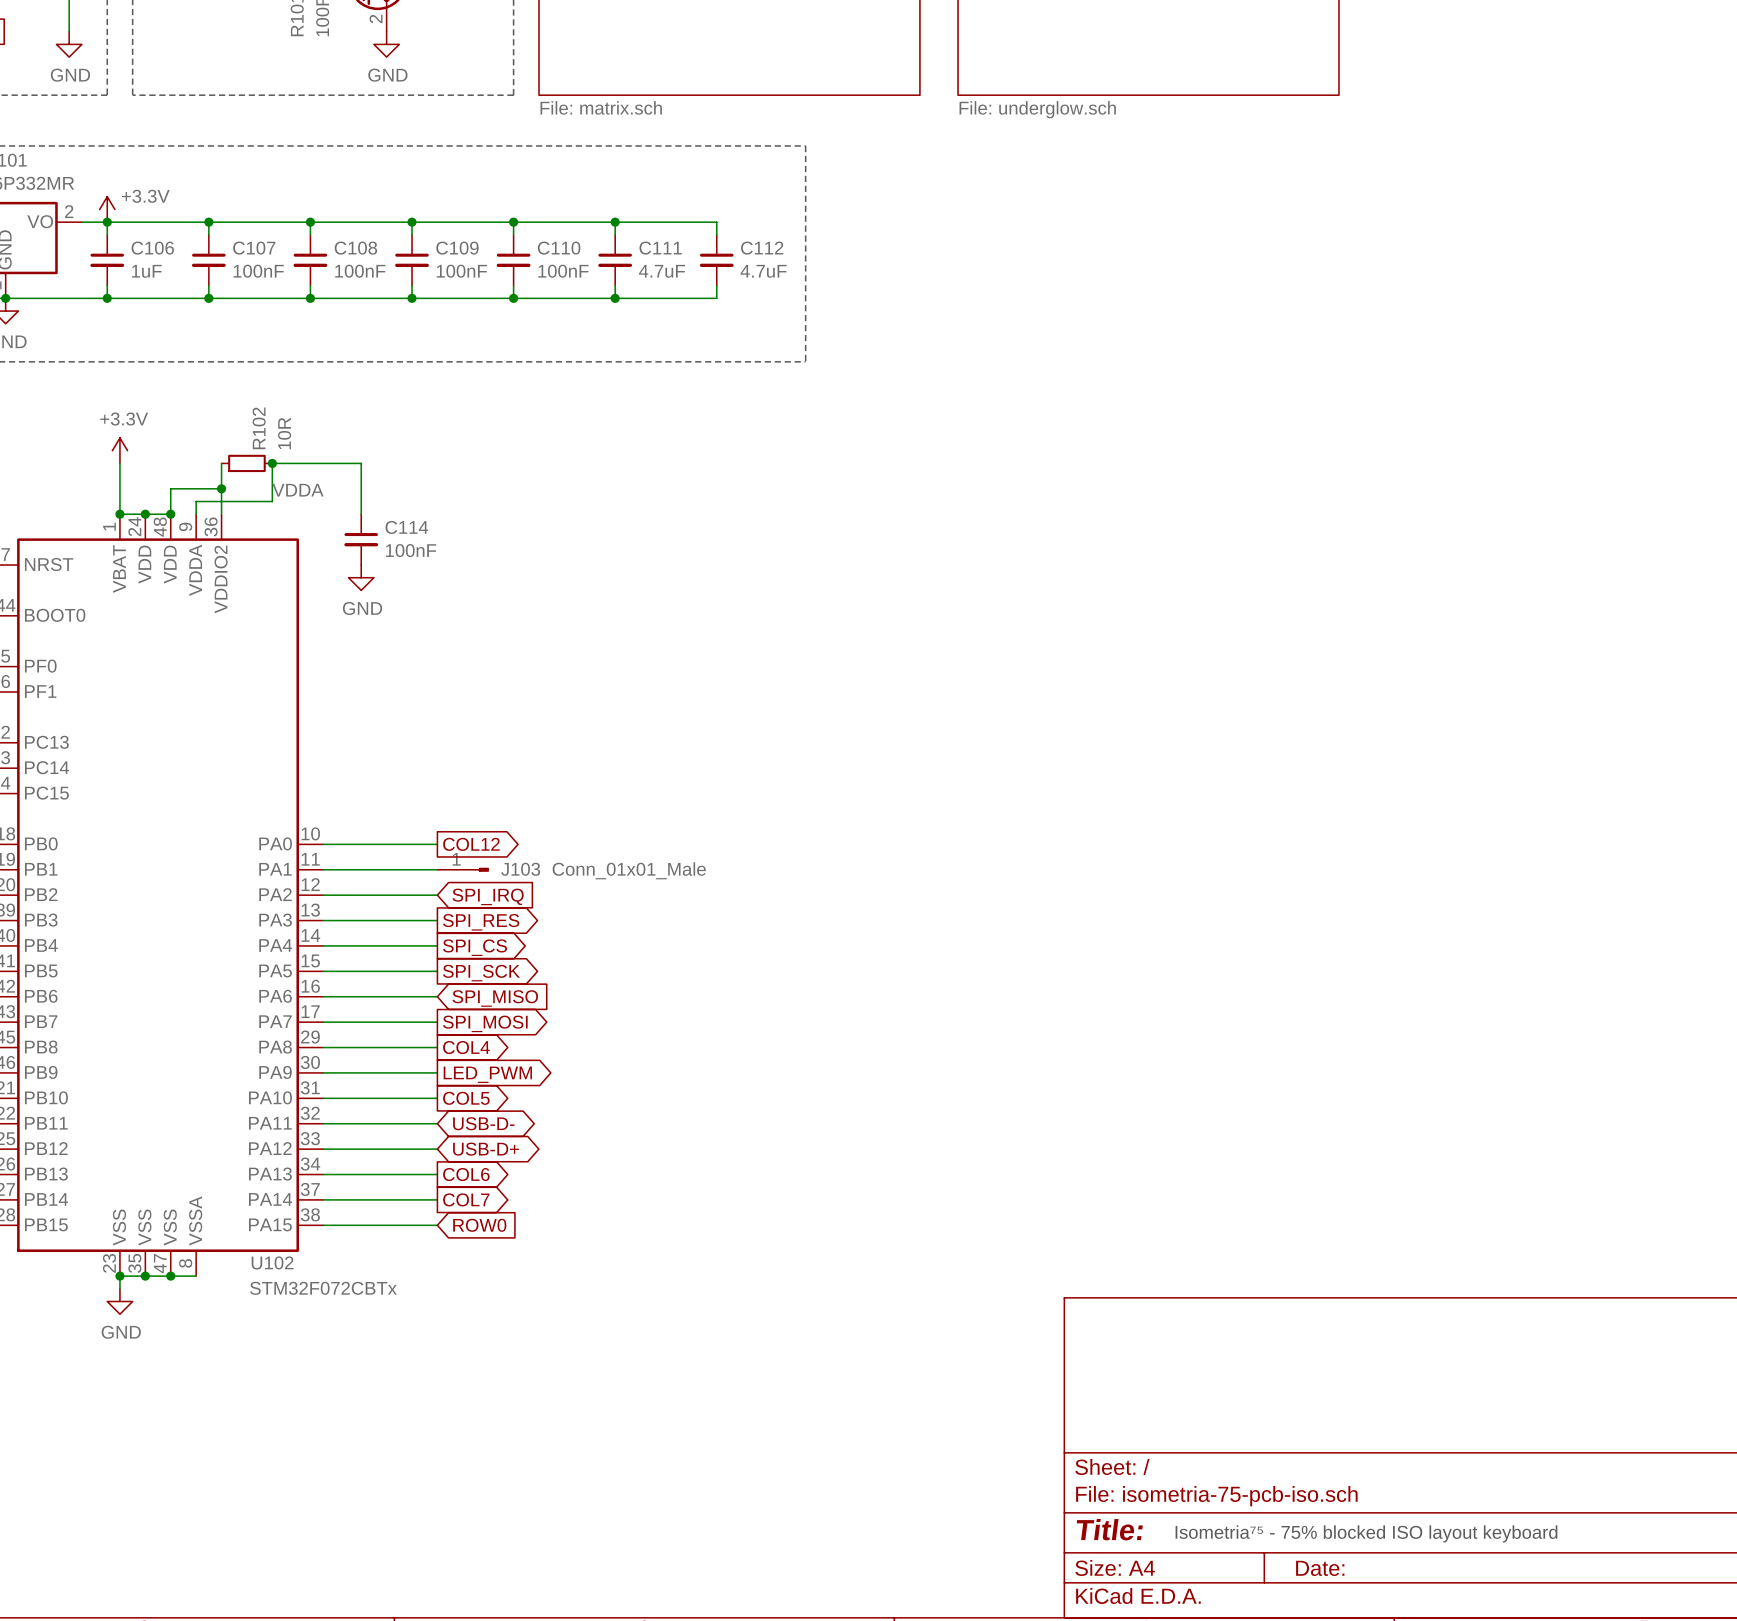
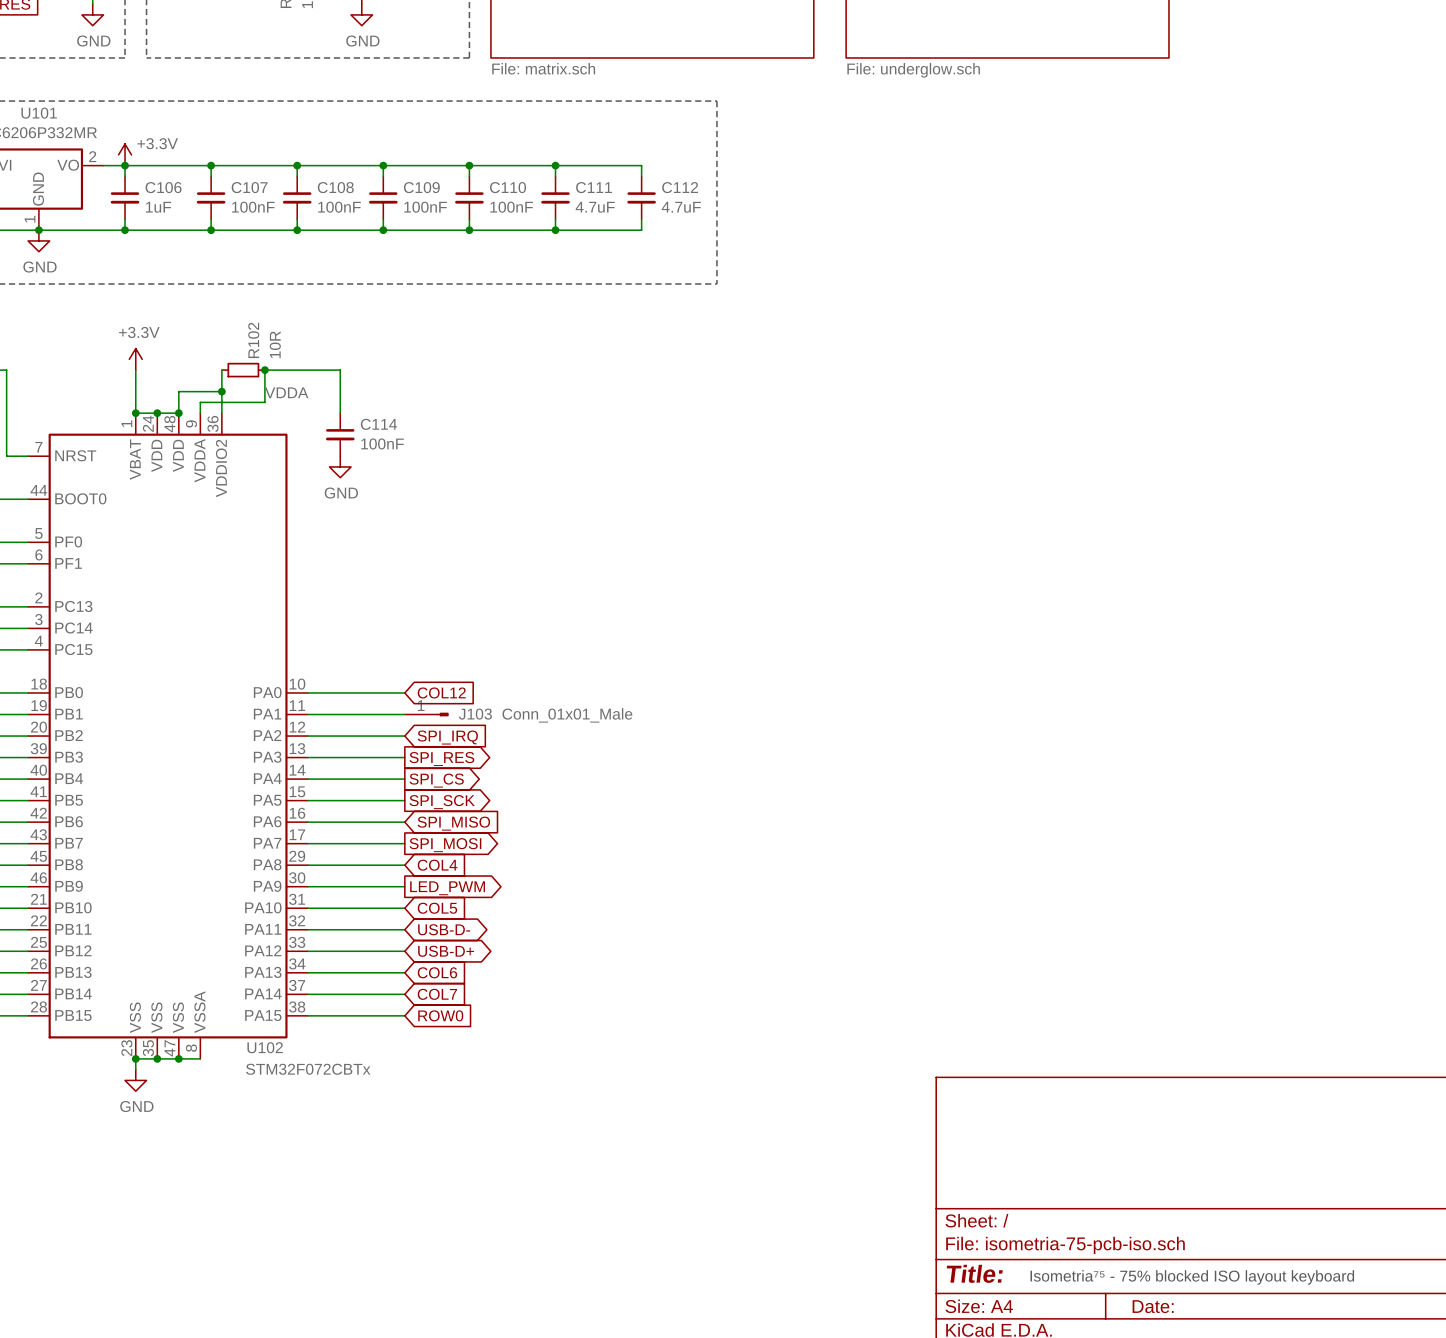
global label shape: output (471, 844) -> input (441, 692)
global label shape: output (466, 1047) -> input (437, 865)
global label shape: output (466, 1098) -> input (437, 908)
global label shape: output (466, 1174) -> input (437, 972)
global label shape: output (466, 1199) -> input (437, 994)

